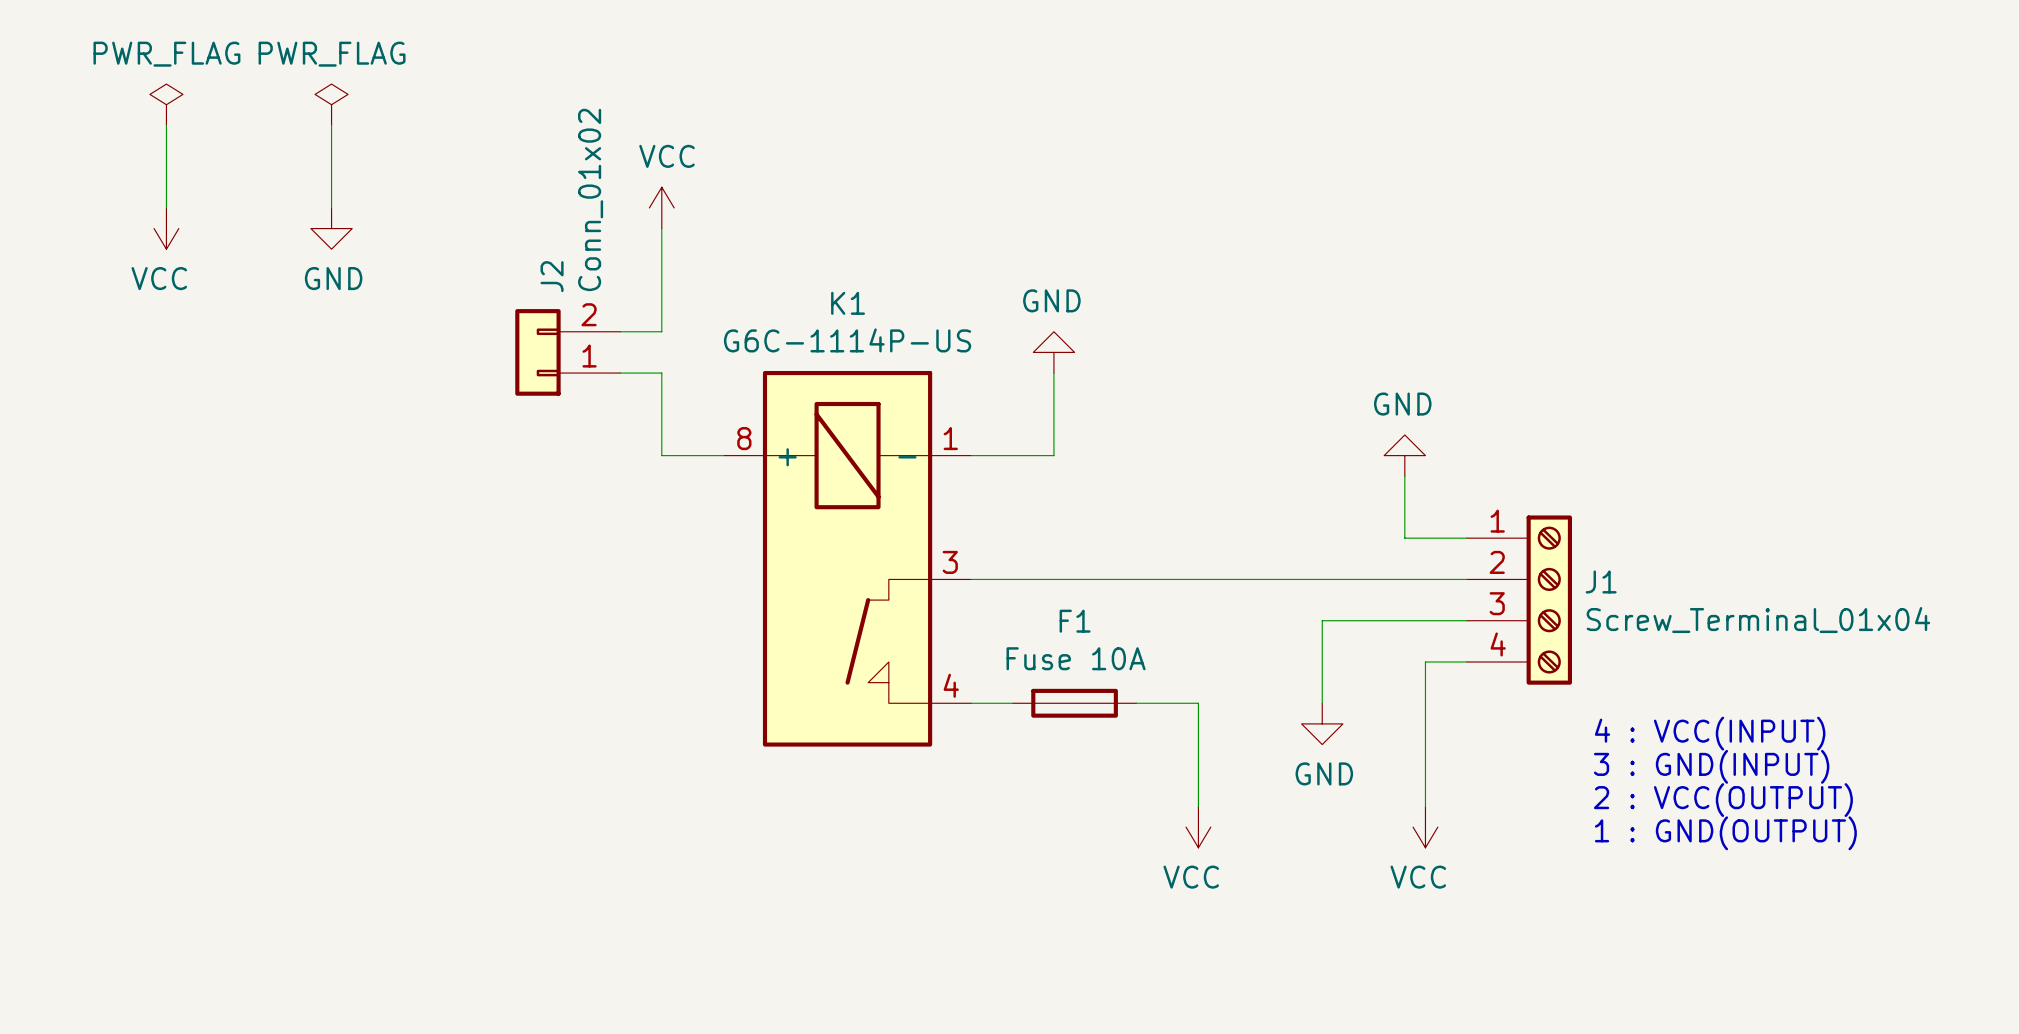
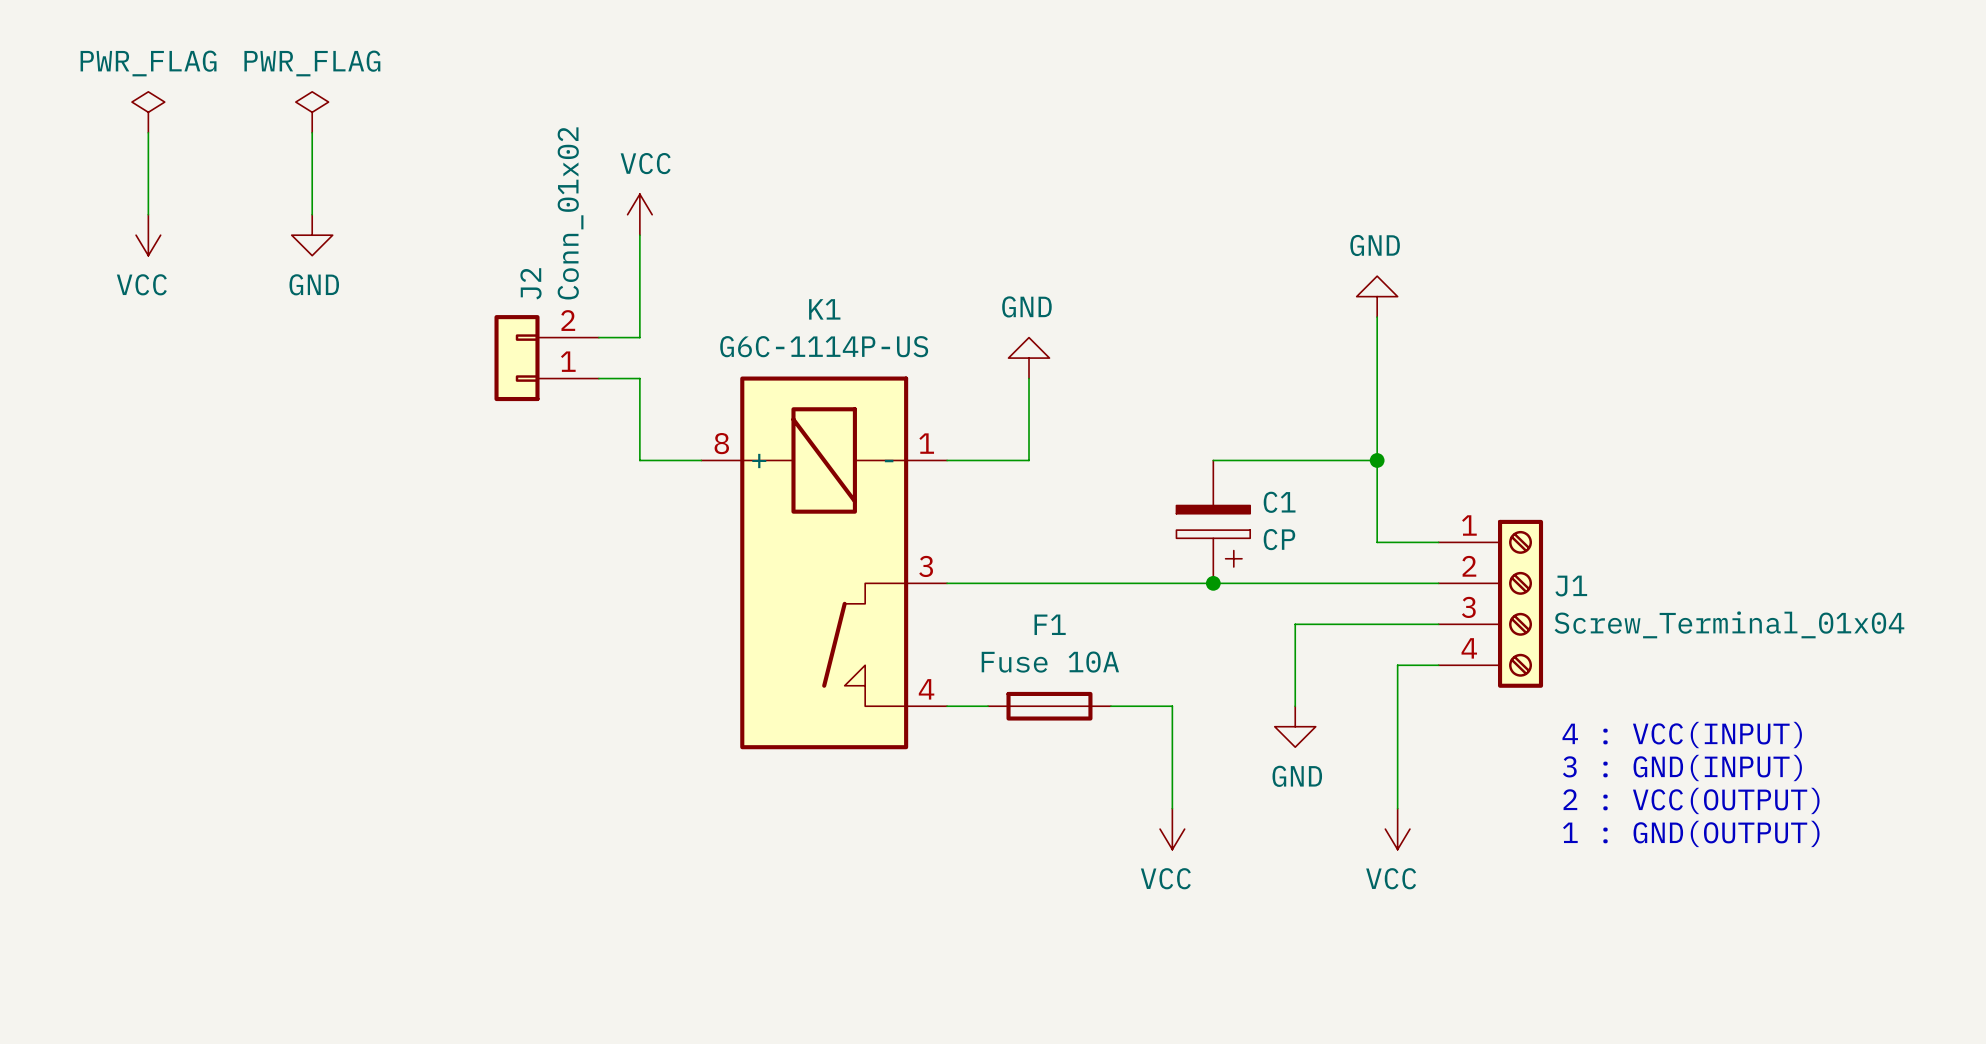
wire: none -> (1377, 317) (1377, 480)
wire: none -> (1213, 460) (1377, 460)
power symbol position: GND (1404, 455) -> GND (1377, 296)
junction: none -> (1377, 460)
C1: none -> CP (1213, 521)
junction: none -> (1213, 583)

